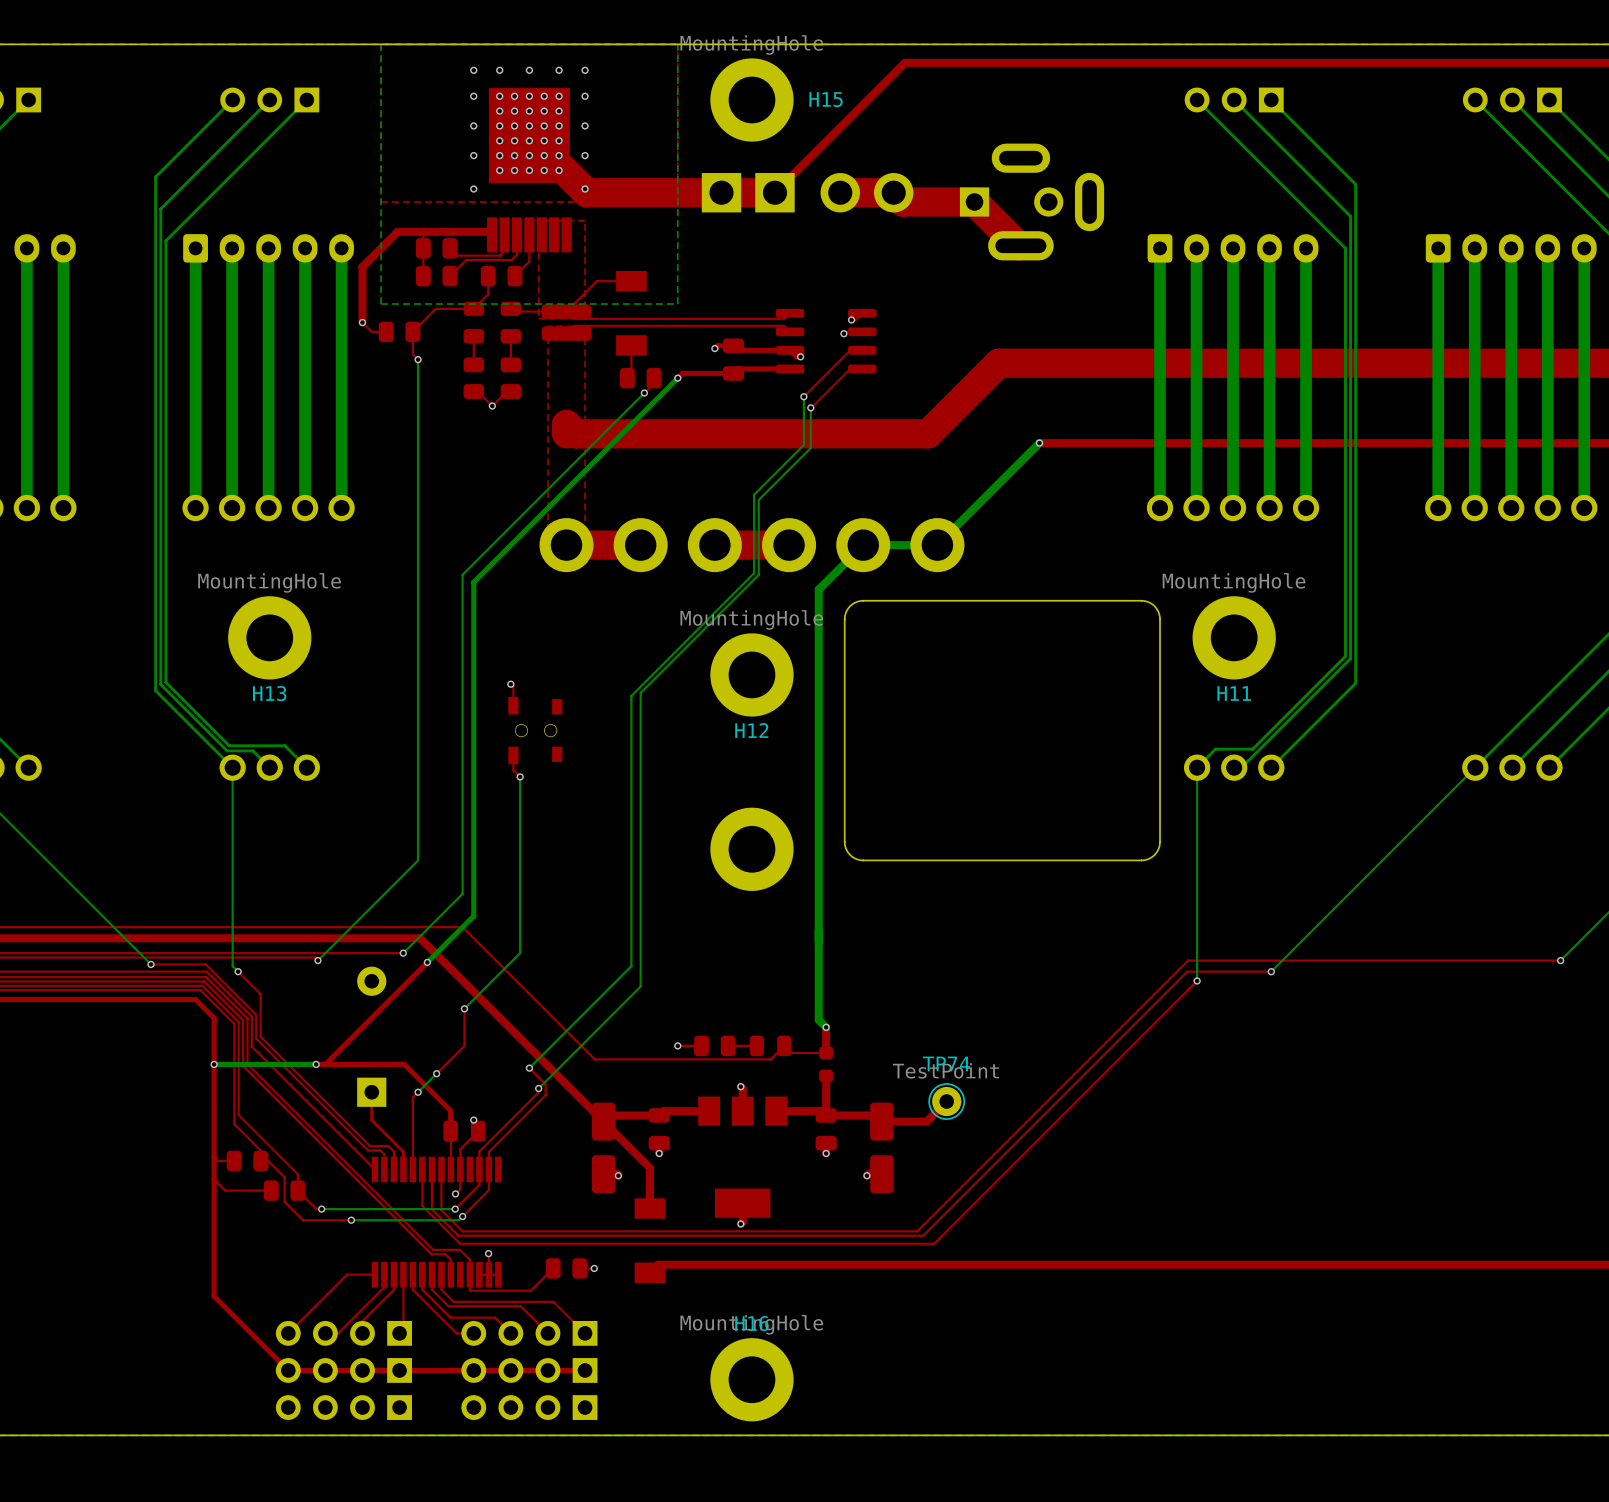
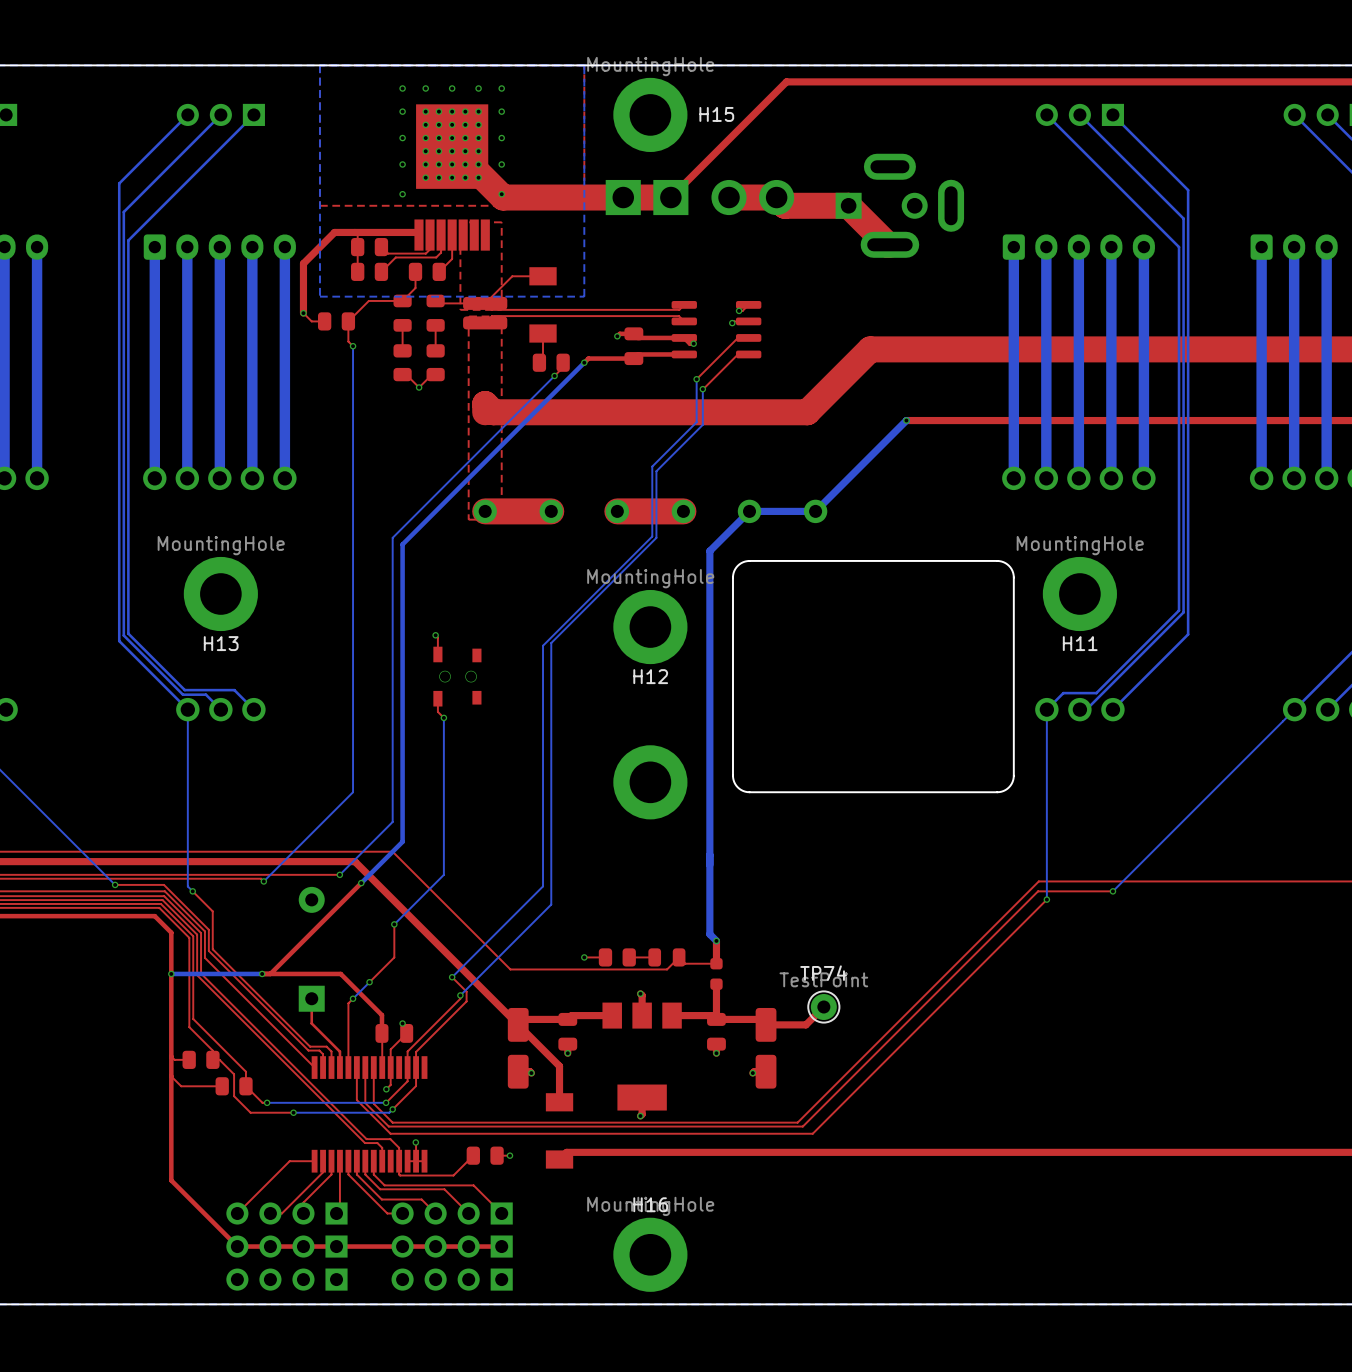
part footprint: [539, 518, 594, 573] -> [473, 499, 497, 524]
part footprint: [613, 518, 668, 573] -> [539, 499, 563, 524]
part footprint: [687, 518, 742, 573] -> [605, 499, 630, 524]
part footprint: [762, 518, 817, 573] -> [671, 499, 696, 524]
part footprint: [836, 518, 891, 573] -> [737, 499, 762, 524]
part footprint: [910, 518, 965, 573] -> [803, 499, 828, 524]

